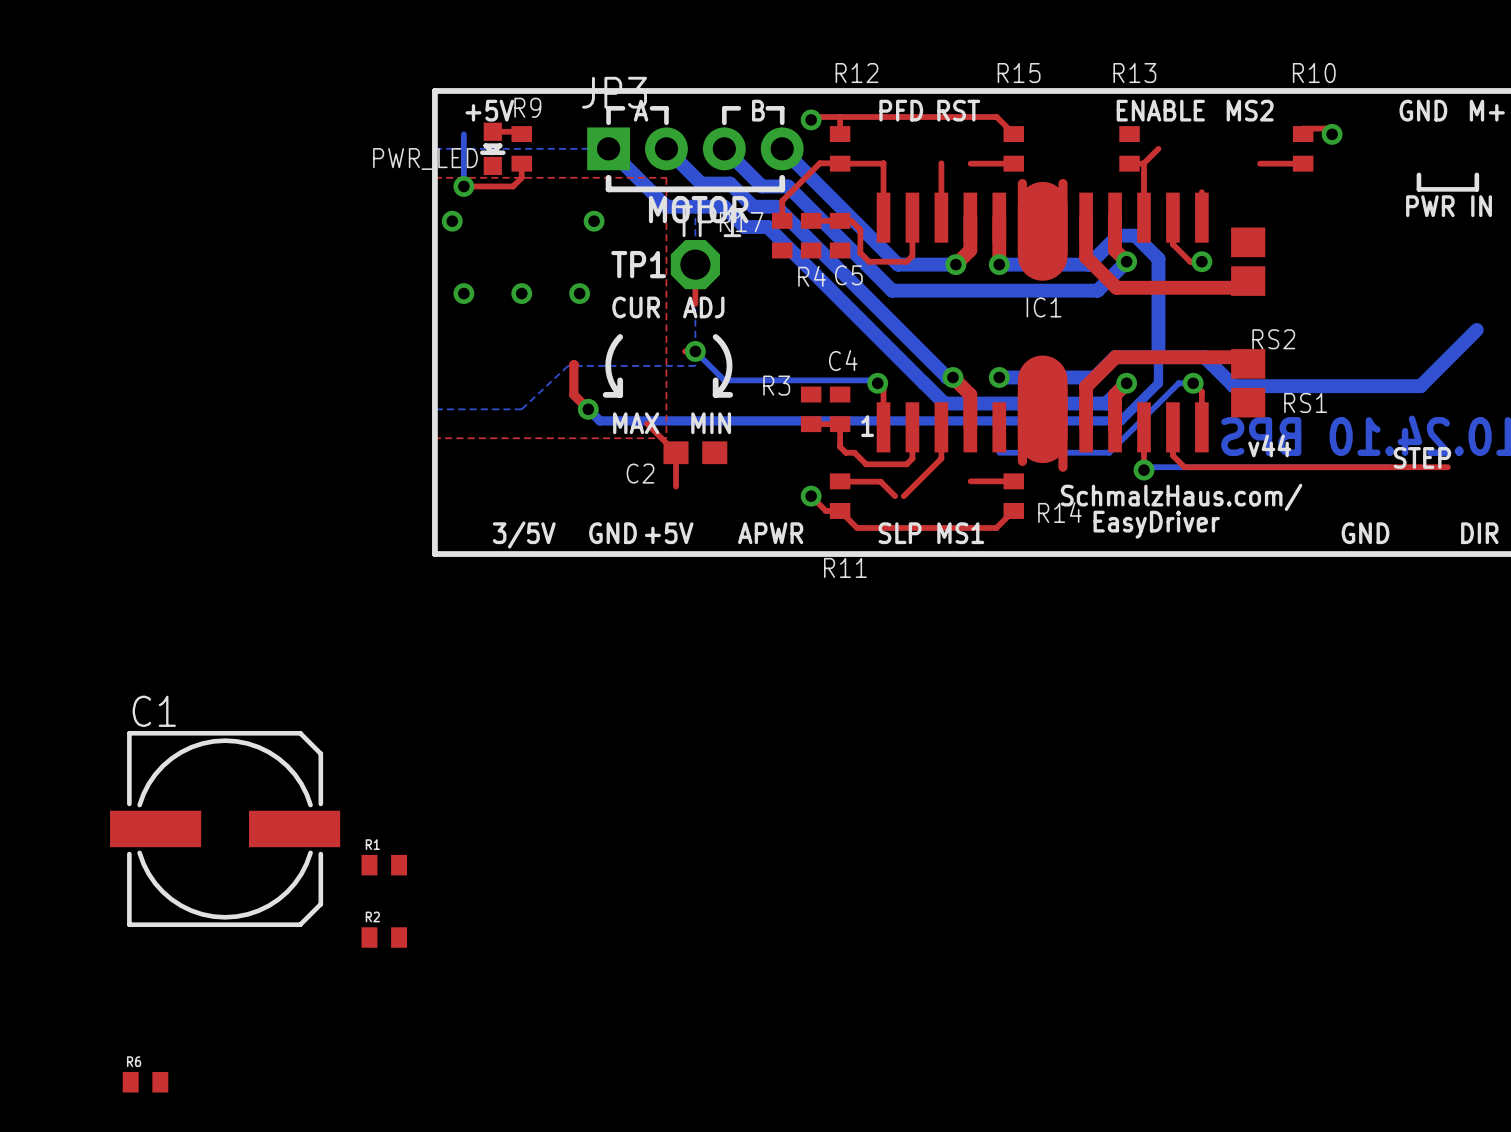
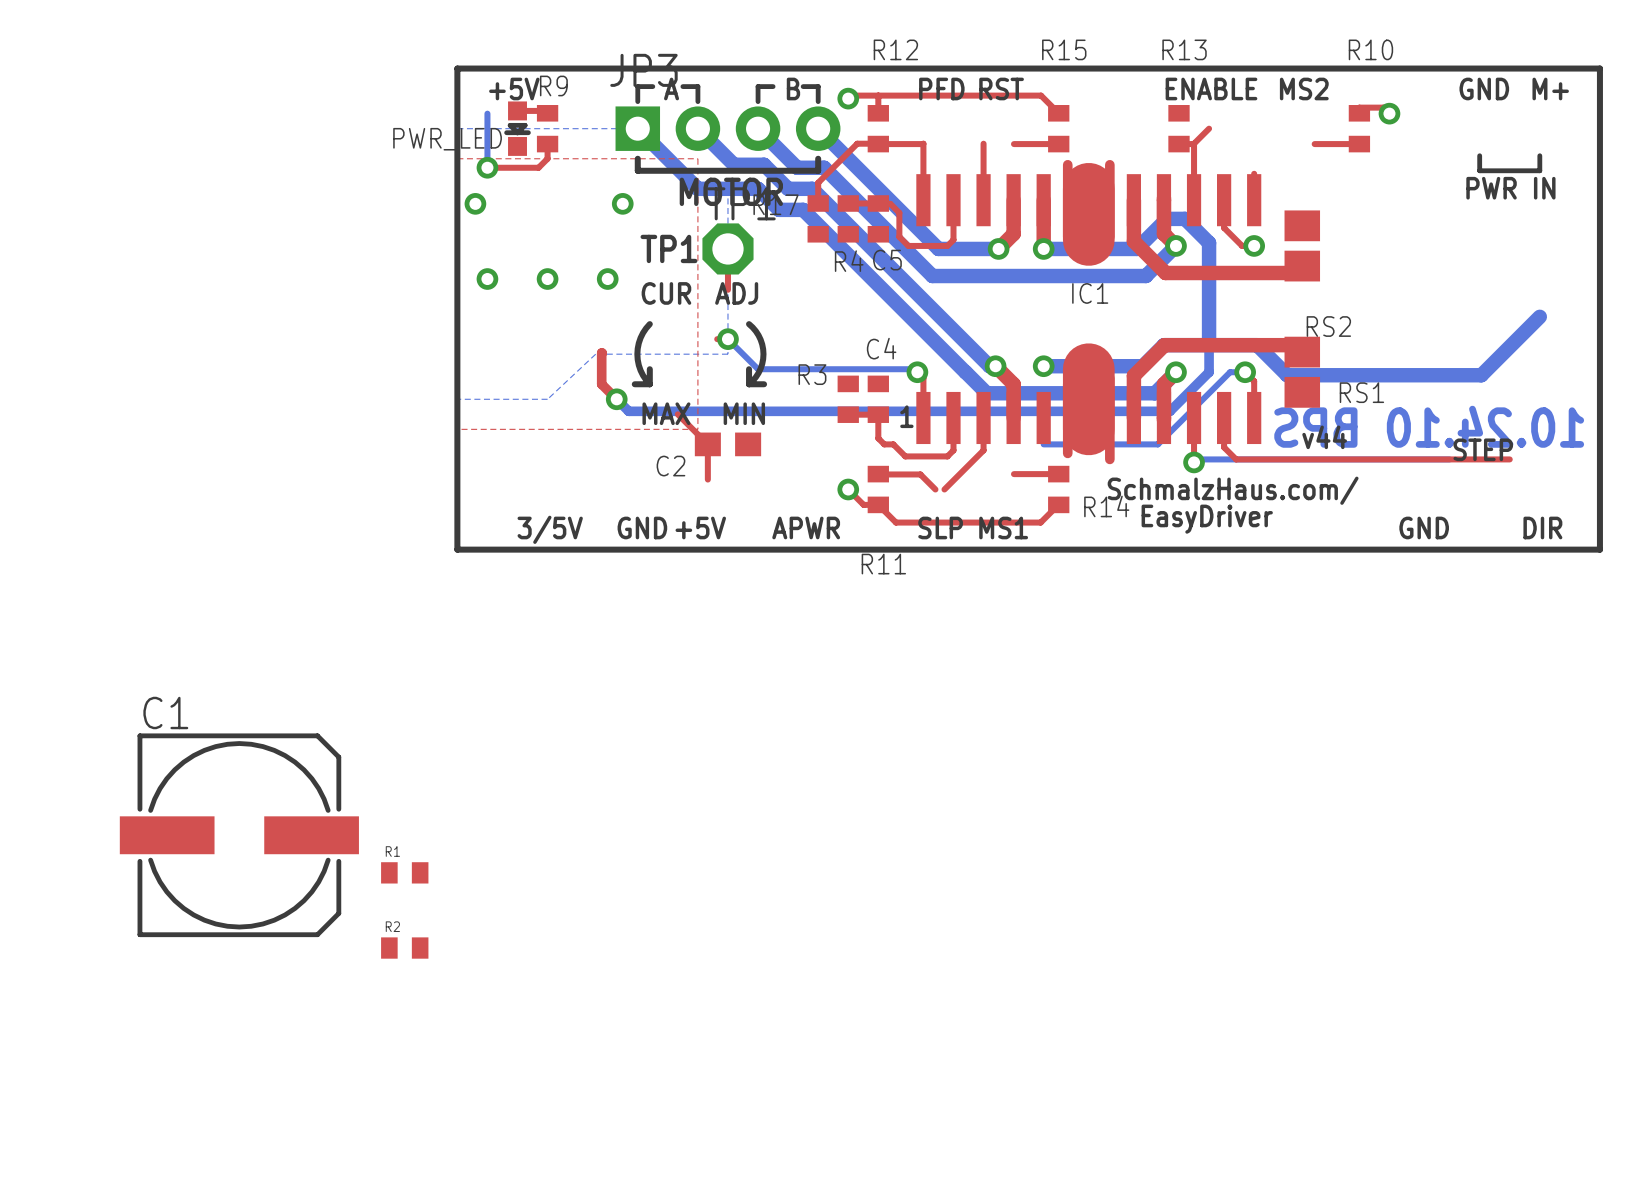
R6: (145, 1082) -> none

